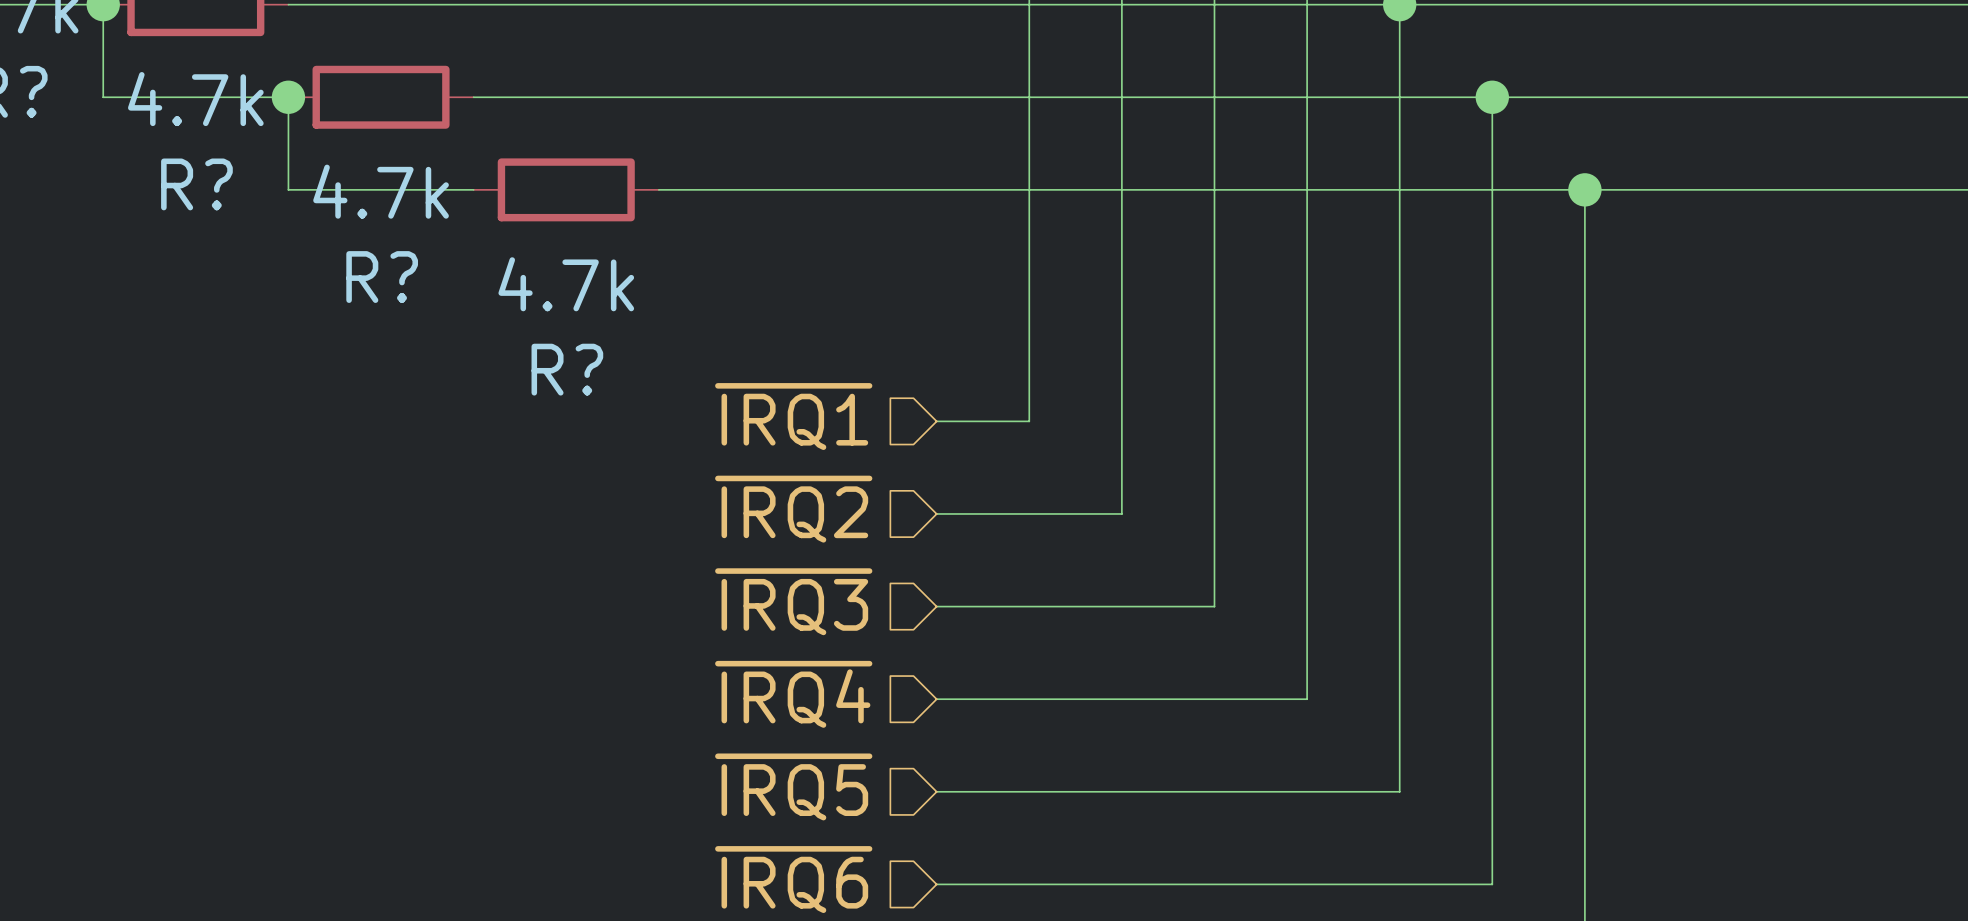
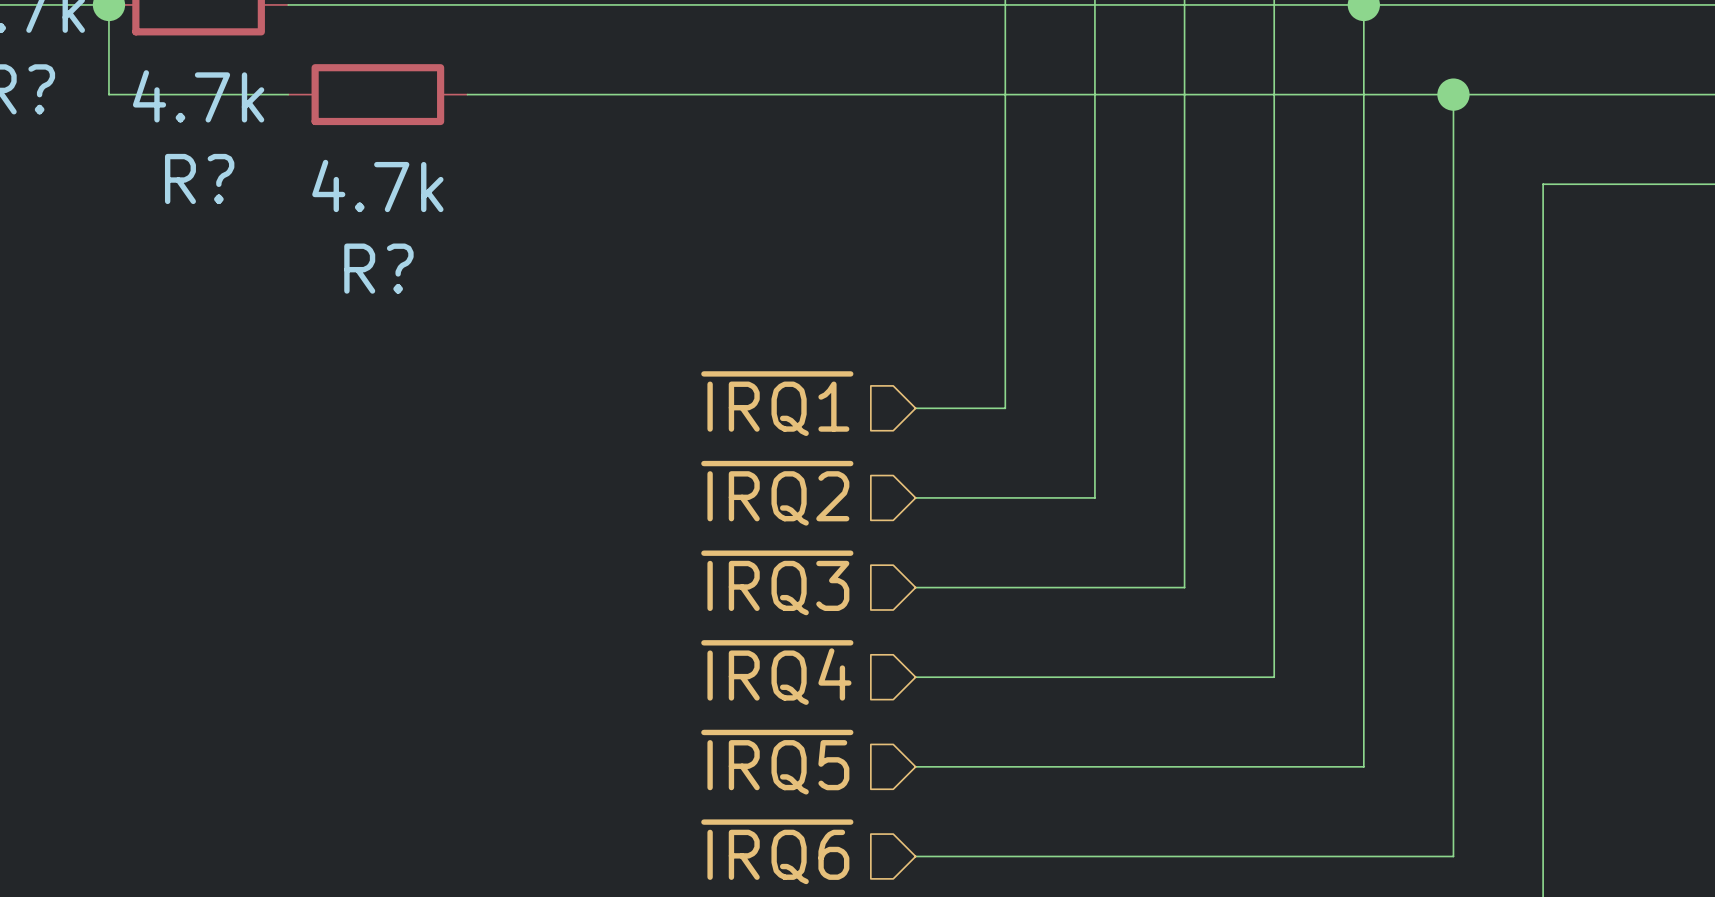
wire: (288, 97) (288, 189) (473, 189) -> none
junction: (288, 97) -> none
R?: 4.7k (566, 189) -> none
wire: (658, 189) (1584, 189) -> none
junction: (1584, 189) -> none

